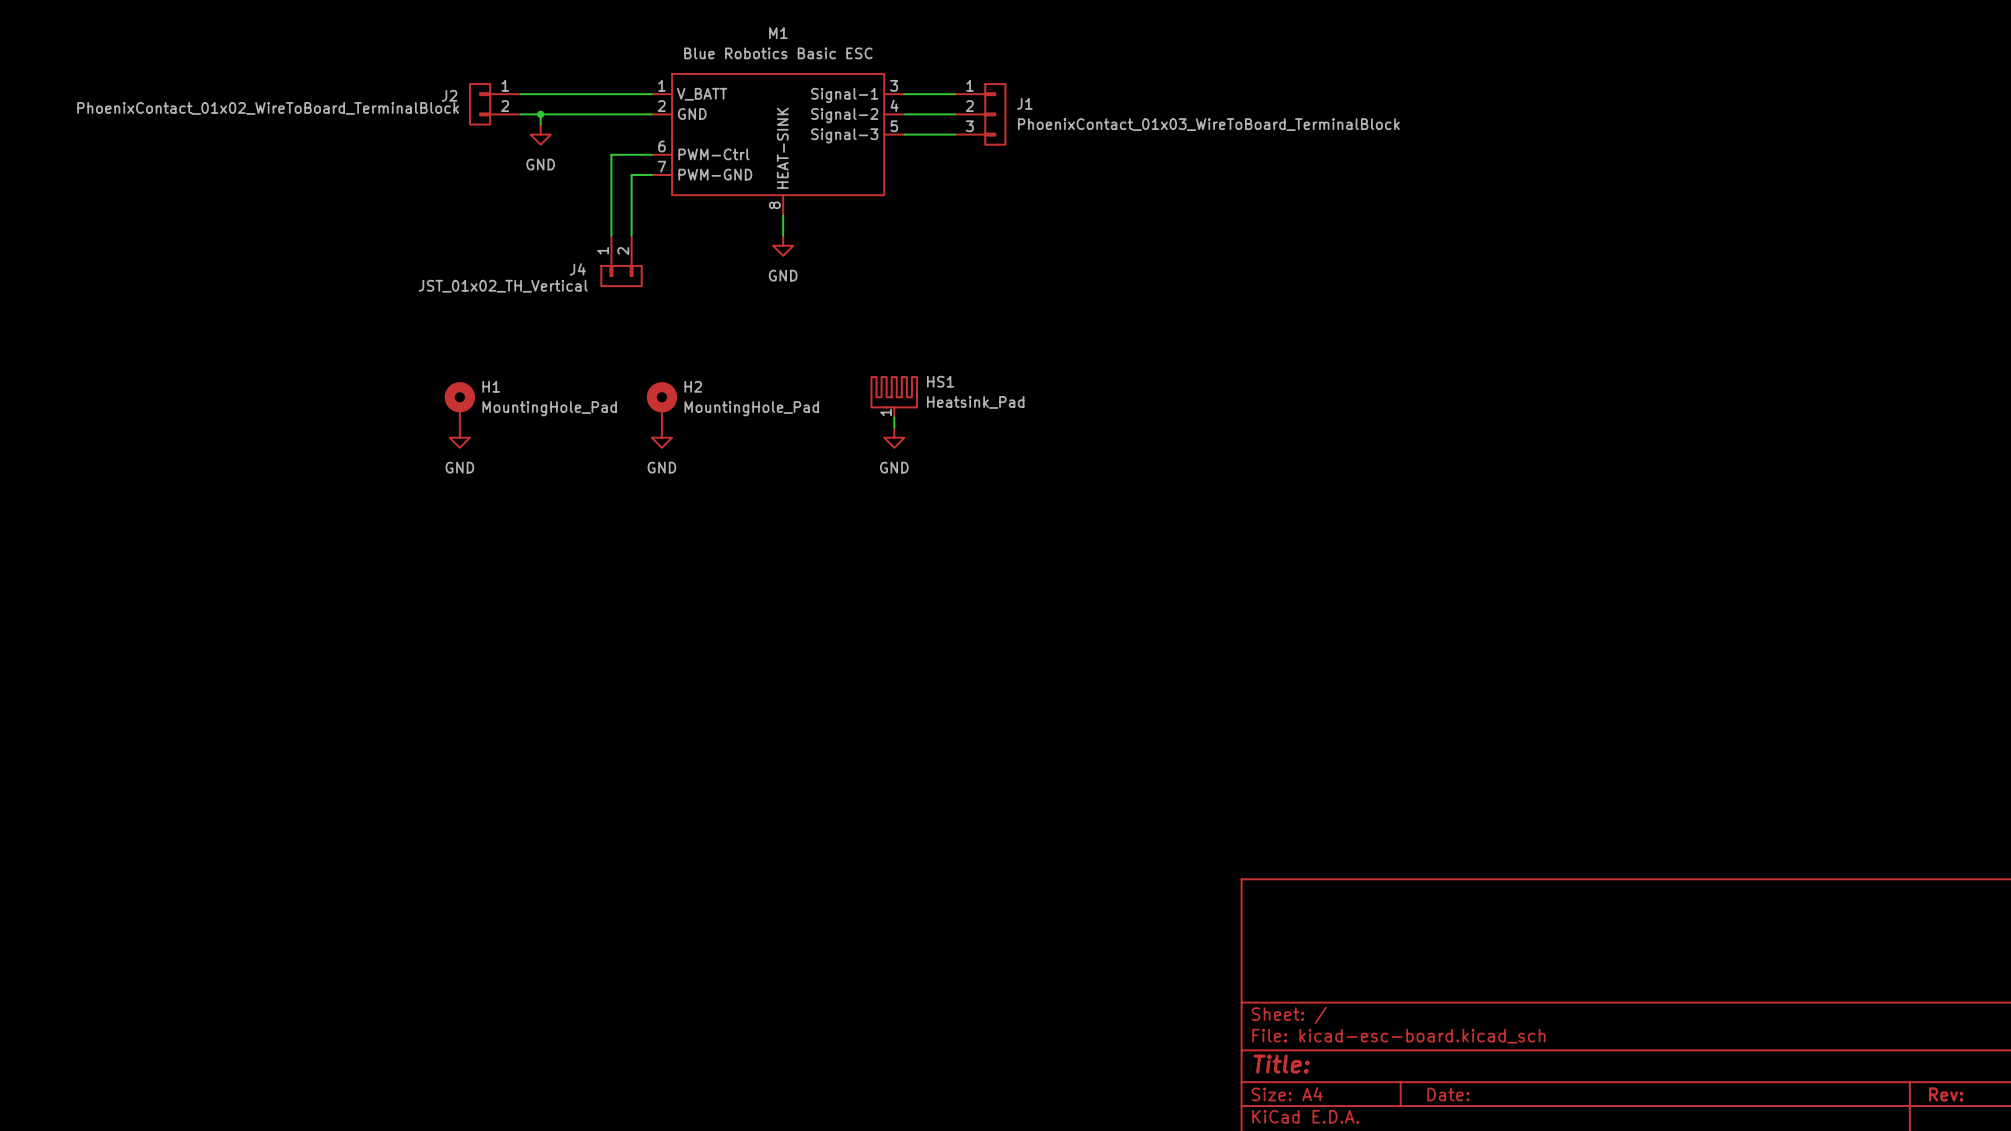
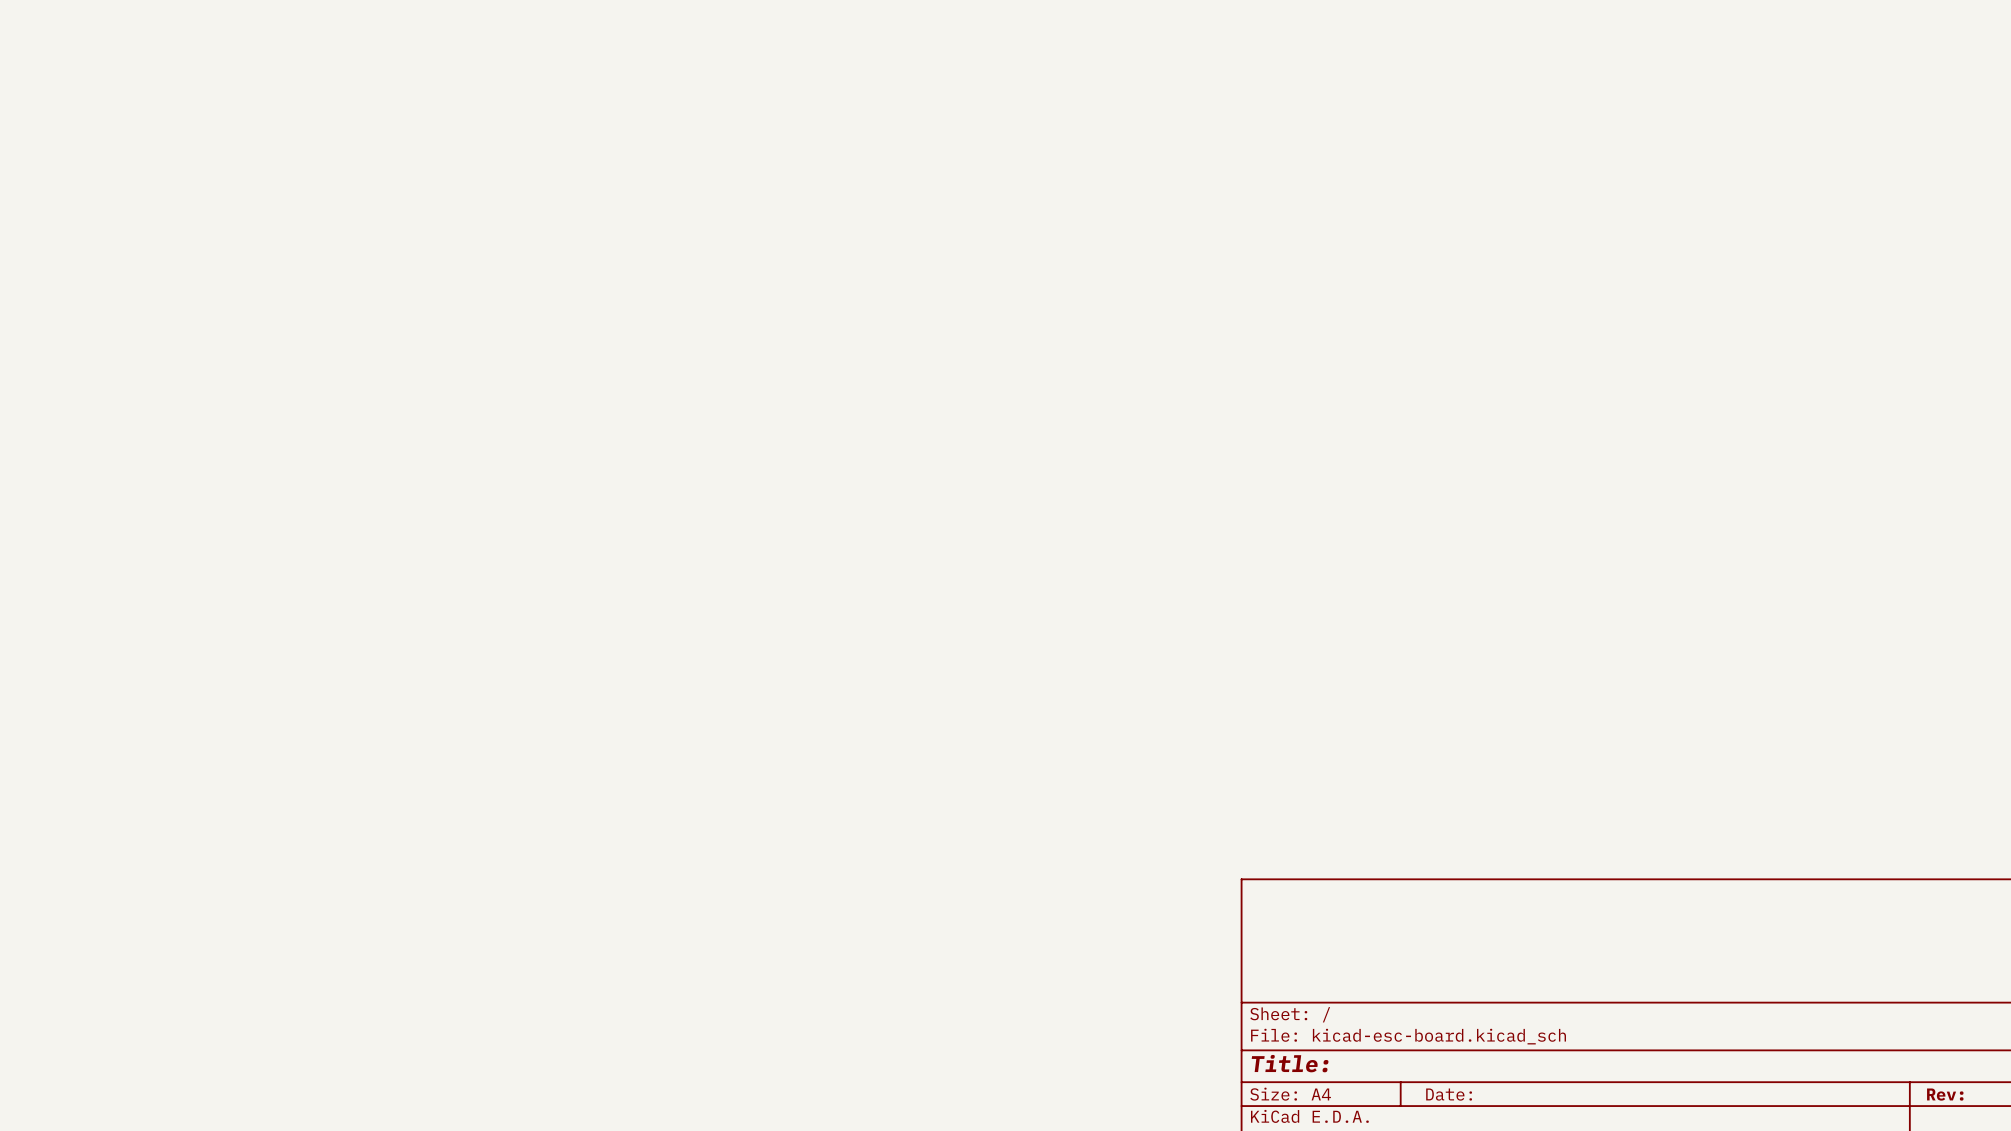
wire: (520, 94) (651, 94) -> none
wire: (904, 94) (954, 94) -> none
J2: PhoenixContact_01x02_WireToBoard_TerminalBlock (494, 104) -> none
wire: (520, 114) (651, 114) -> none
wire: (540, 114) (540, 124) -> none
junction: (540, 114) -> none
wire: (904, 114) (954, 114) -> none
J1: PhoenixContact_01x03_WireToBoard_TerminalBlock (980, 114) -> none
power symbol: GND (540, 134) -> none
wire: (904, 134) (954, 134) -> none
M1: Blue Robotics Basic ESC (778, 144) -> none
wire: (651, 154) (611, 154) (611, 235) -> none
wire: (651, 175) (631, 175) (631, 235) -> none
wire: (783, 215) (783, 235) -> none
power symbol: GND (783, 245) -> none
J4: JST_01x02_TH_Vertical (621, 261) -> none
HS1: Heatsink_Pad (894, 396) -> none
H1: MountingHole_Pad (459, 404) -> none
H2: MountingHole_Pad (661, 404) -> none
wire: (894, 417) (894, 427) -> none
power symbol: GND (459, 437) -> none
power symbol: GND (661, 437) -> none
power symbol: GND (894, 437) -> none

